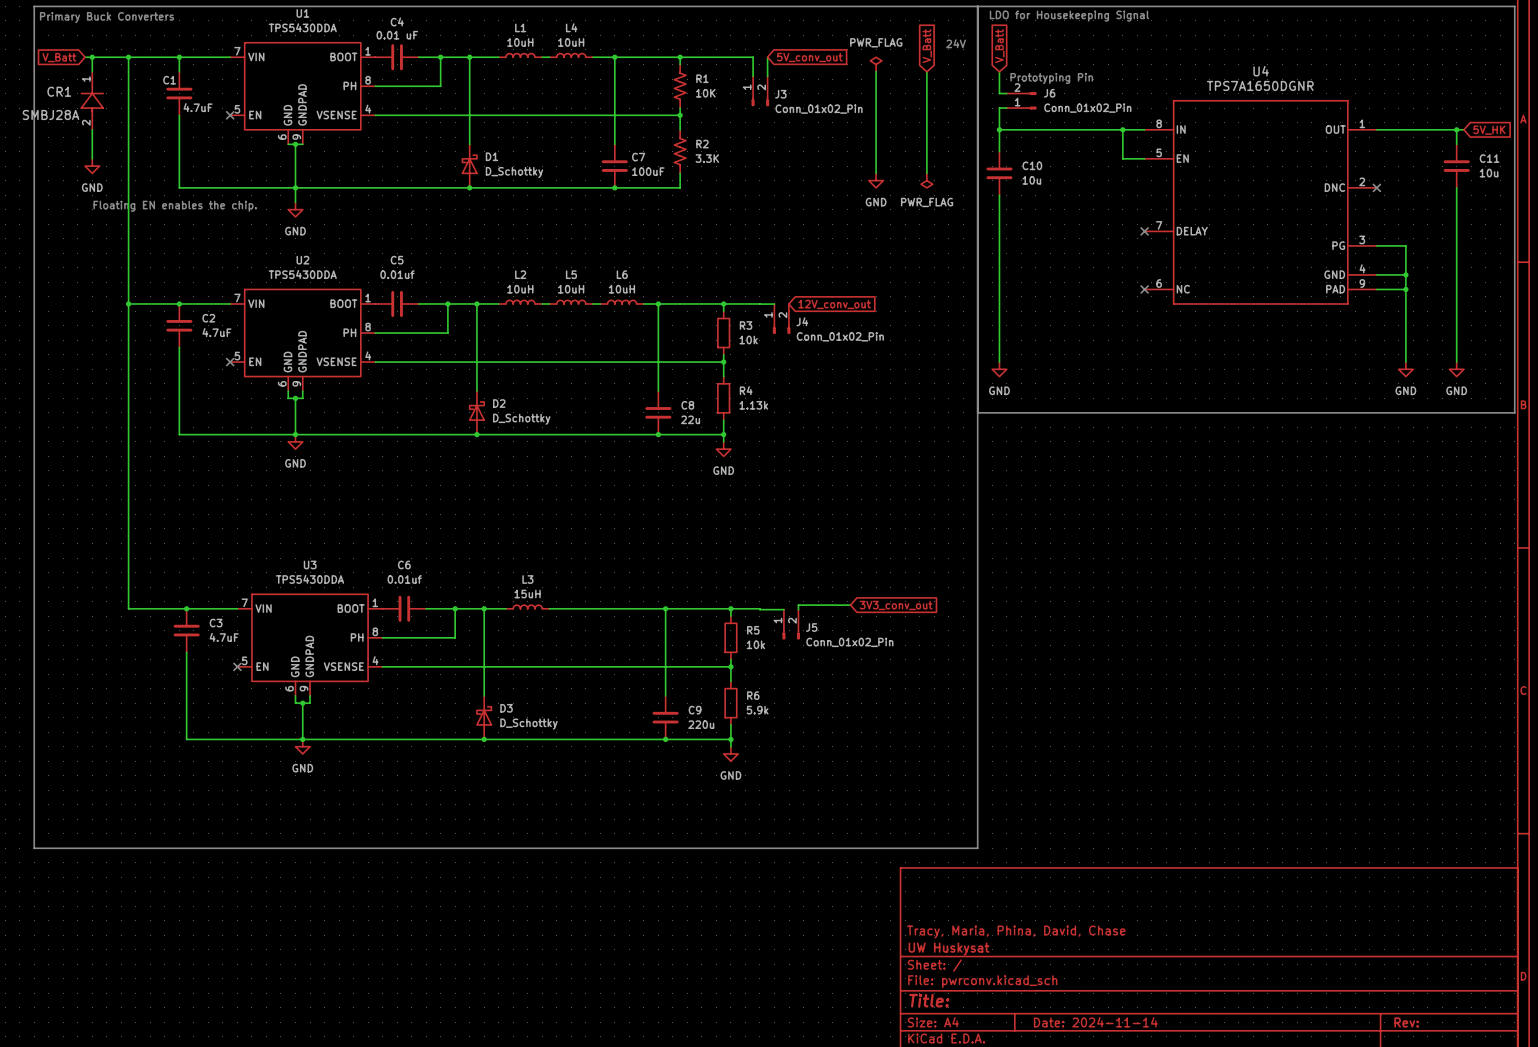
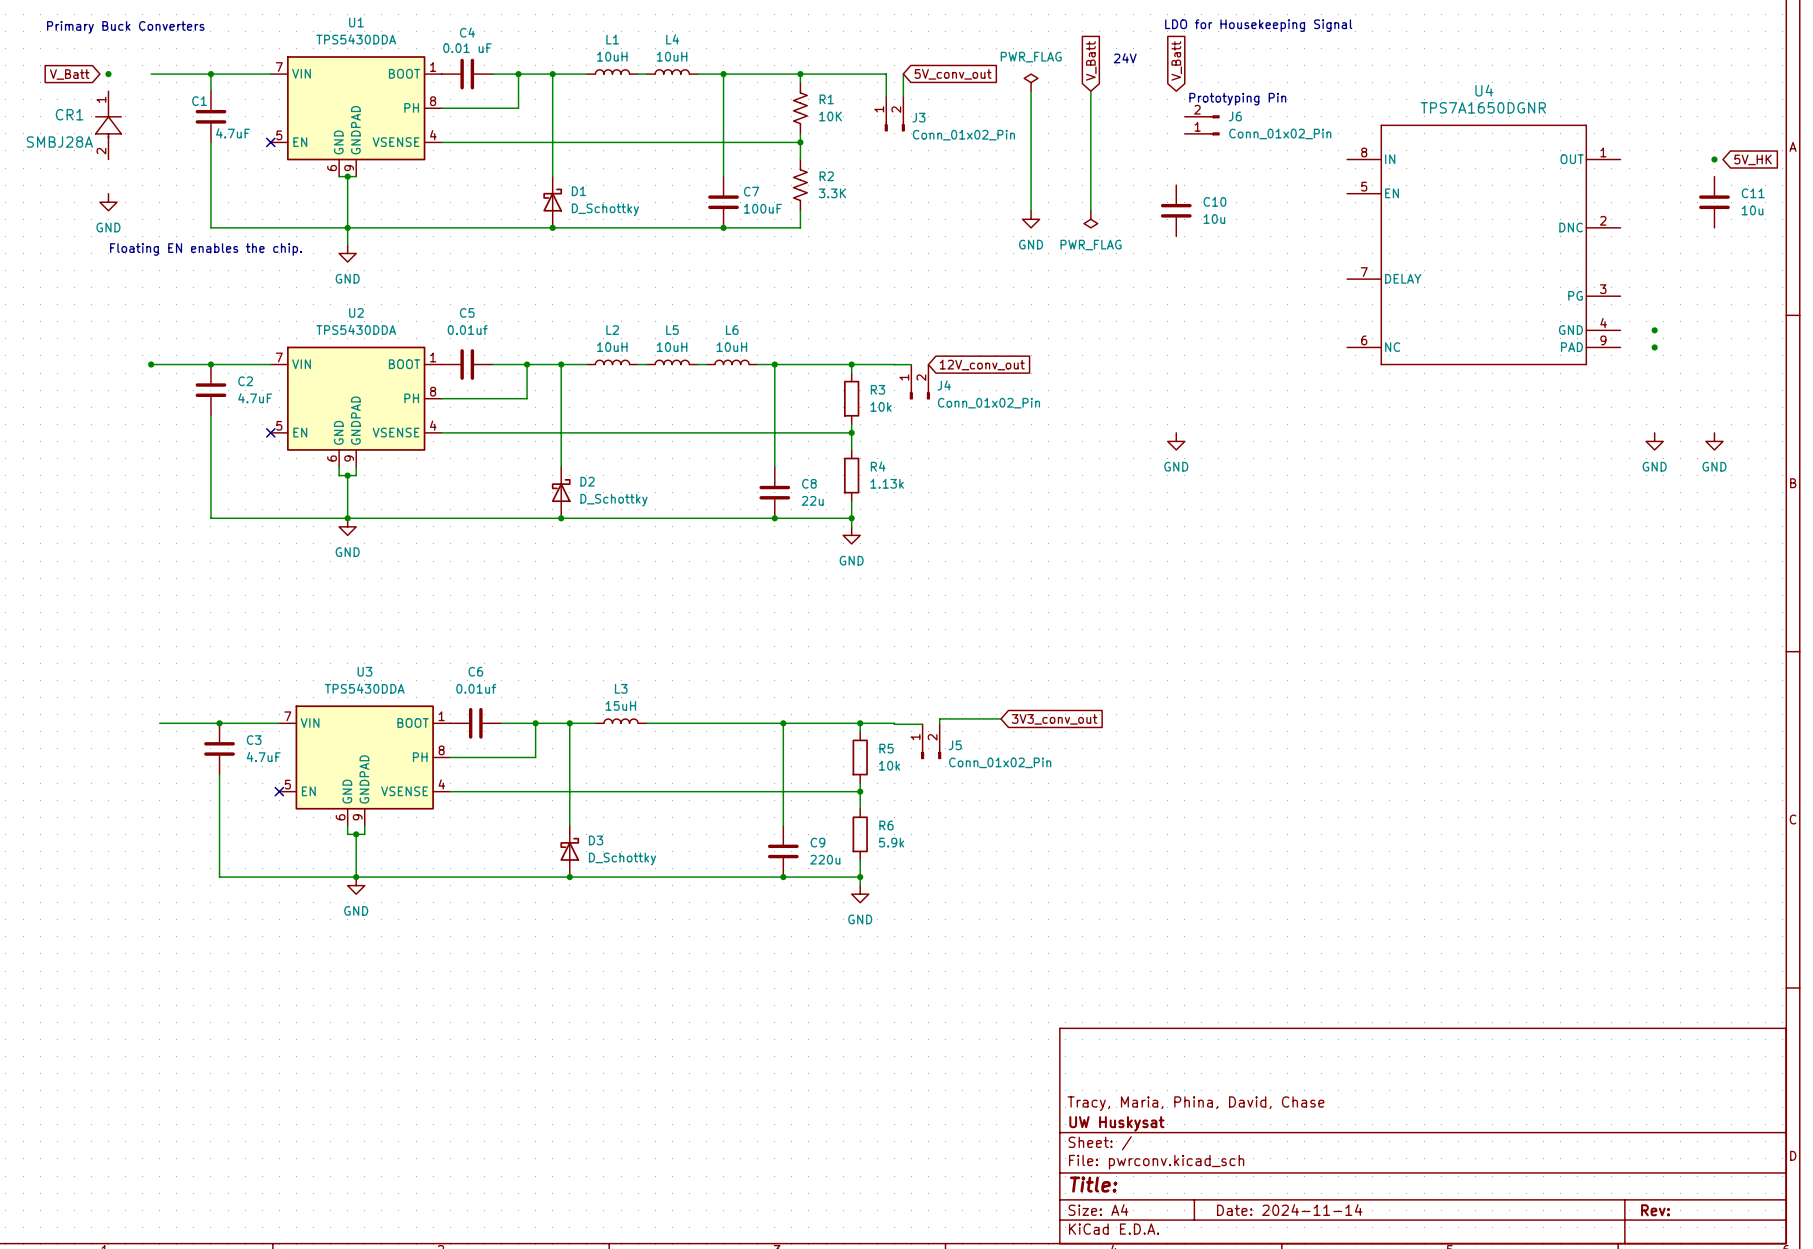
line: (977, 6) (977, 848) (34, 848) (34, 6) (1514, 6) (1514, 412) (977, 412) -> none
wire: (85, 57) (128, 57) (128, 608) (135, 608) -> none
wire: (92, 57) (92, 71) -> none
junction: (128, 57) -> none
wire: (999, 71) (999, 93) (1006, 93) -> none
wire: (1006, 108) (999, 108) (999, 151) -> none
wire: (92, 129) (92, 158) -> none
wire: (999, 129) (1144, 129) -> none
junction: (999, 129) -> none
wire: (1122, 129) (1122, 158) (1144, 158) -> none
junction: (1122, 129) -> none
wire: (1376, 129) (1463, 129) -> none
wire: (1456, 129) (1456, 144) -> none
no-connect mark: (1376, 187) -> none
wire: (1456, 187) (1456, 362) -> none
wire: (999, 195) (999, 362) -> none
no-connect mark: (1144, 231) -> none
wire: (1376, 245) (1405, 245) (1405, 362) -> none
wire: (1376, 274) (1405, 274) -> none
no-connect mark: (1144, 289) -> none
wire: (1376, 289) (1405, 289) -> none

